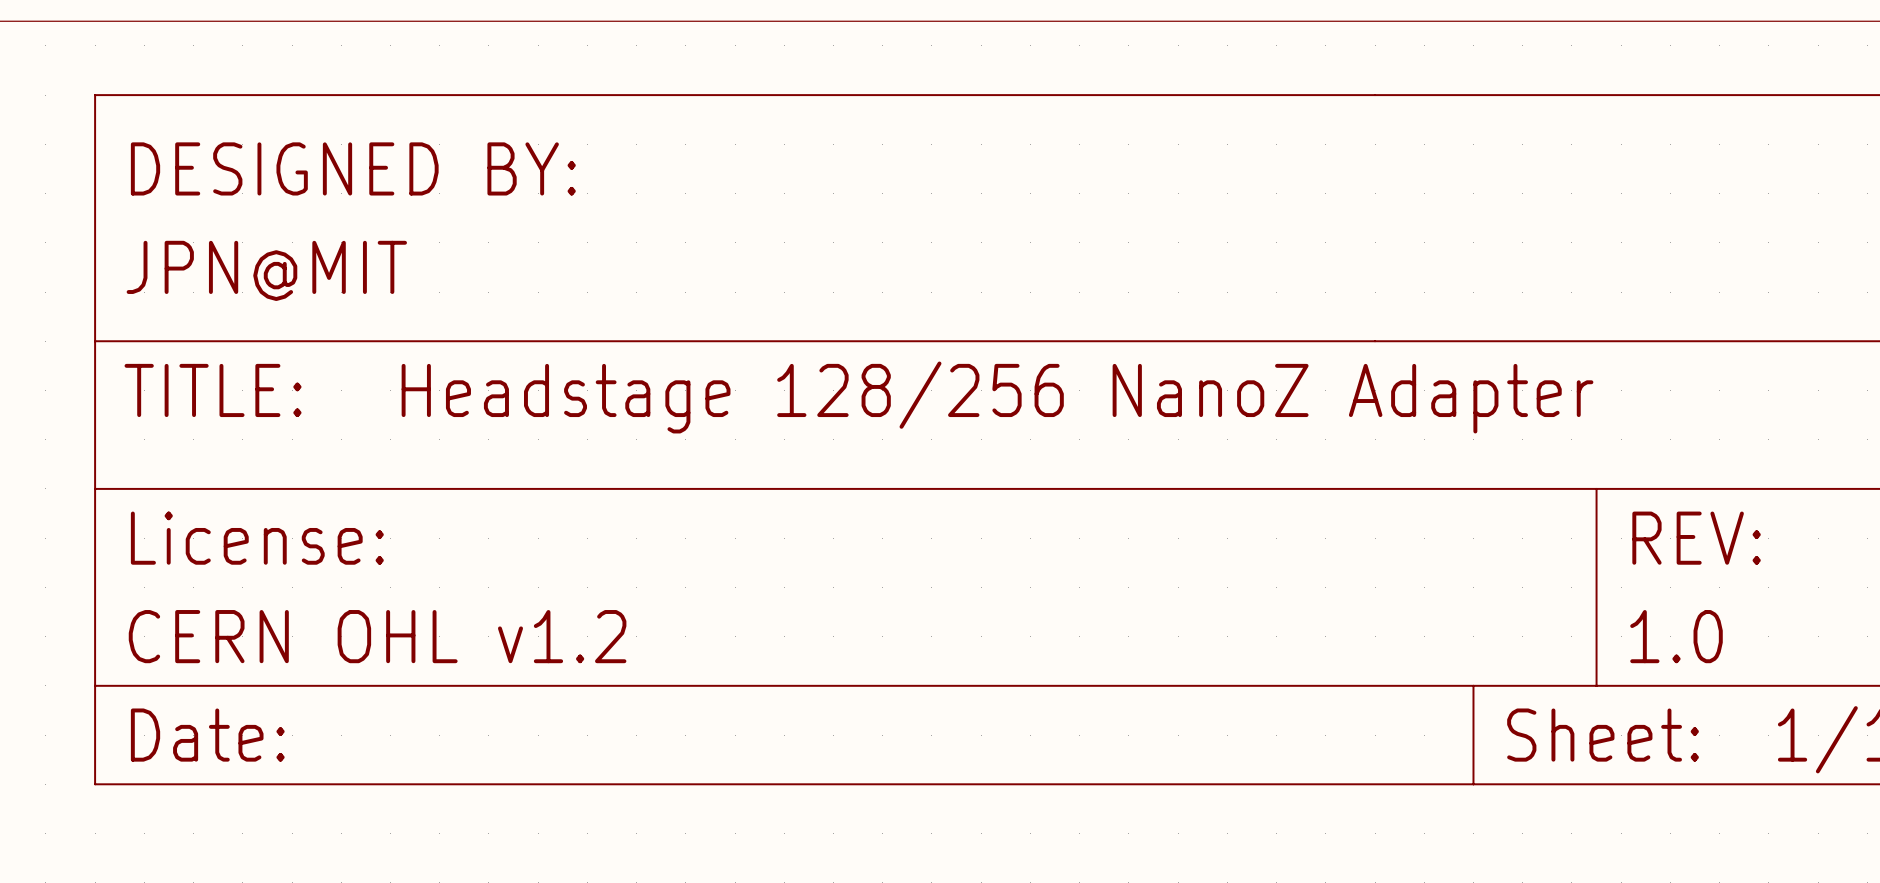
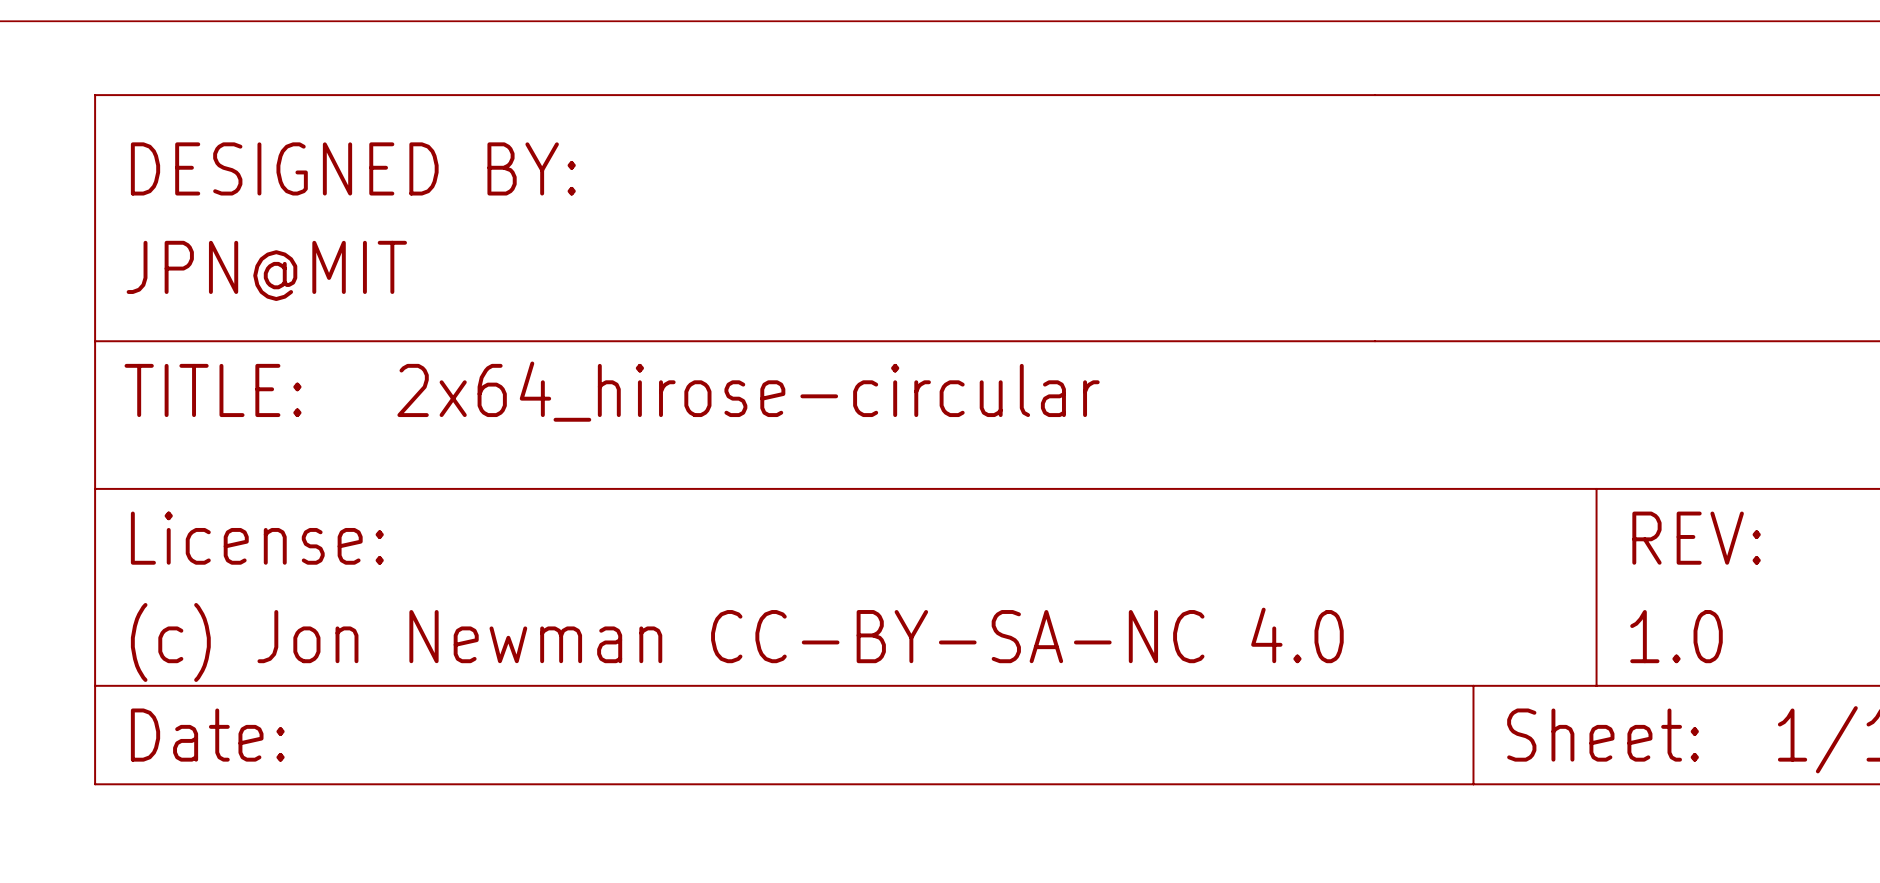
part text: Headstage 128/256 NanoZ Adapter (997, 397) -> 2x64_hirose-circular (748, 391)
part text: CERN OHL v1.2 (377, 636) -> (c) Jon Newman CC-BY-SA-NC 4.0 (737, 642)

